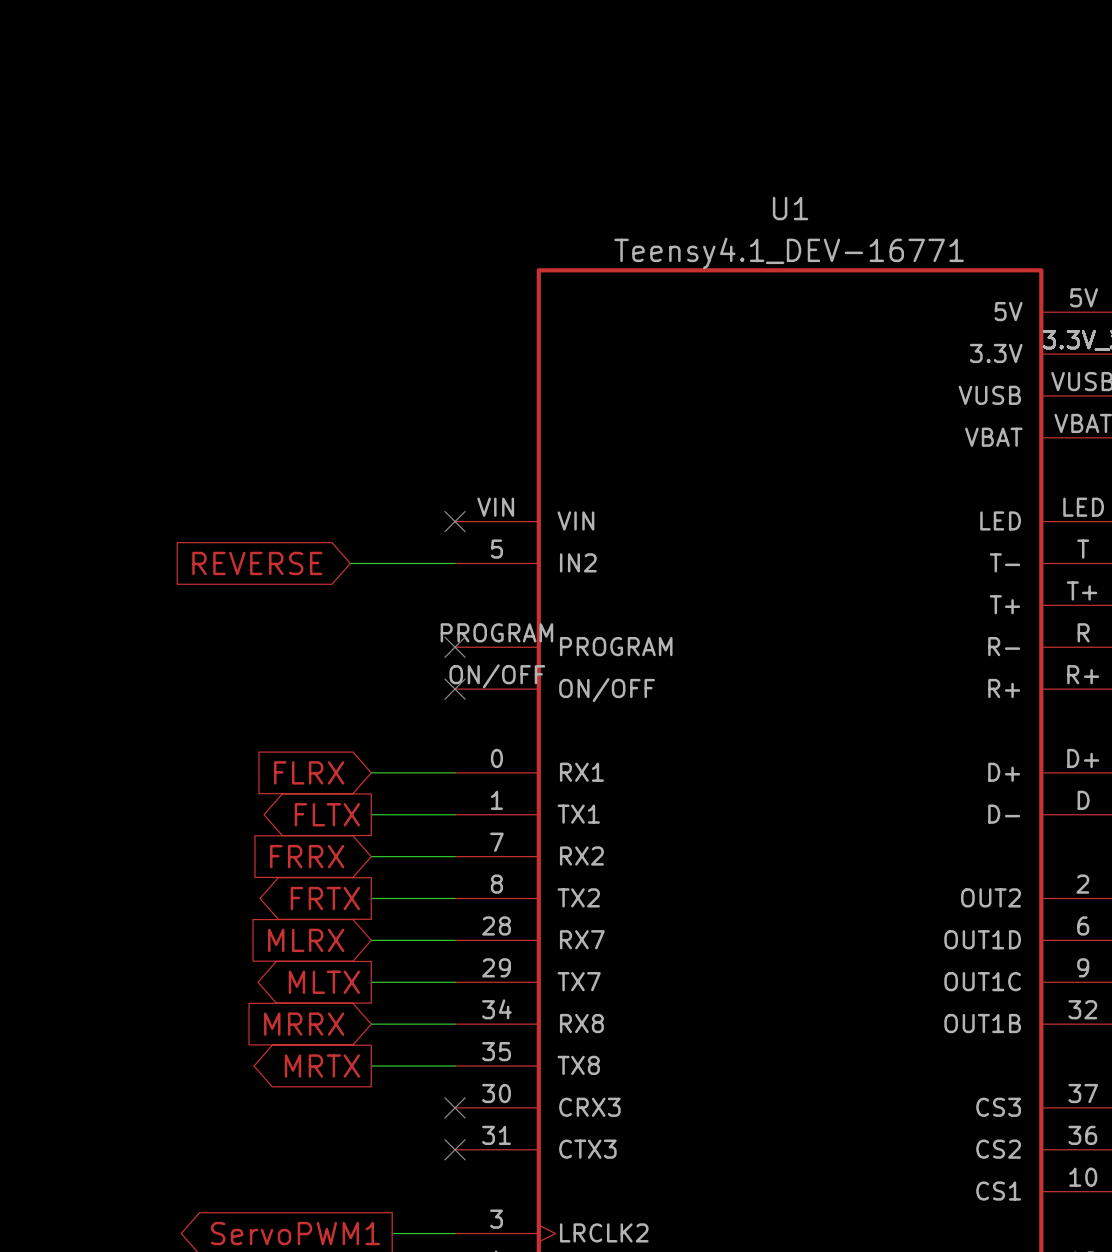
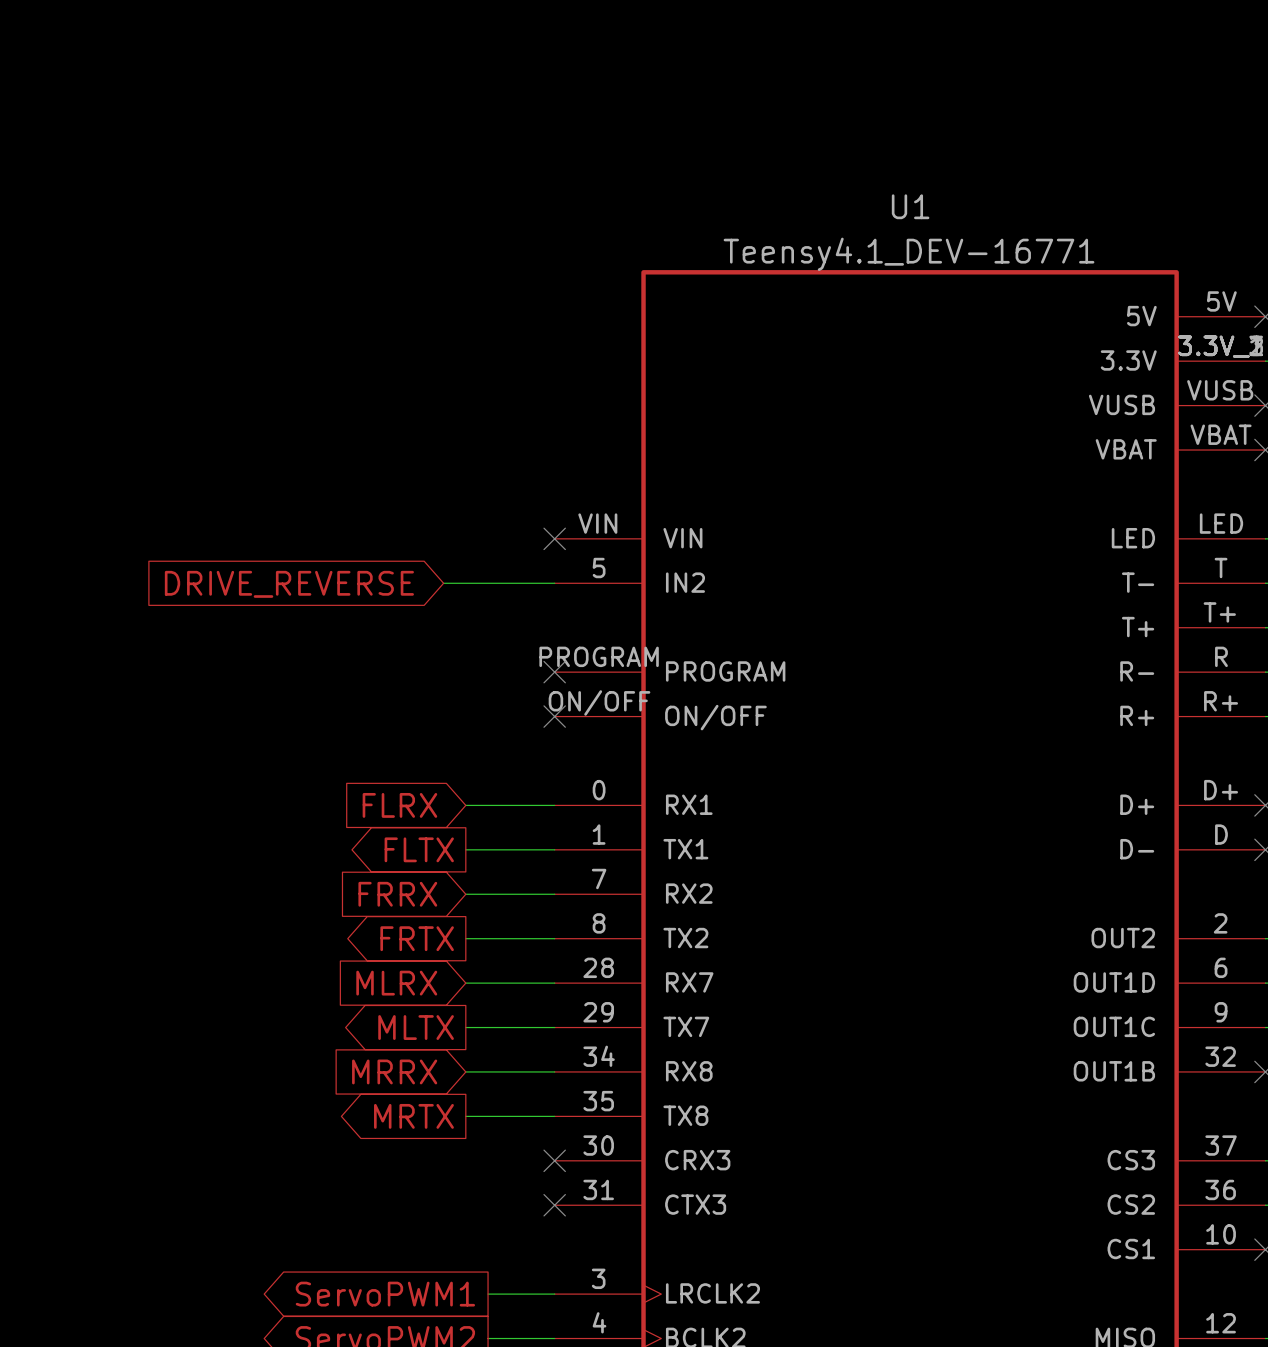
global label: REVERSE (257, 563) -> DRIVE_REVERSE (289, 584)

